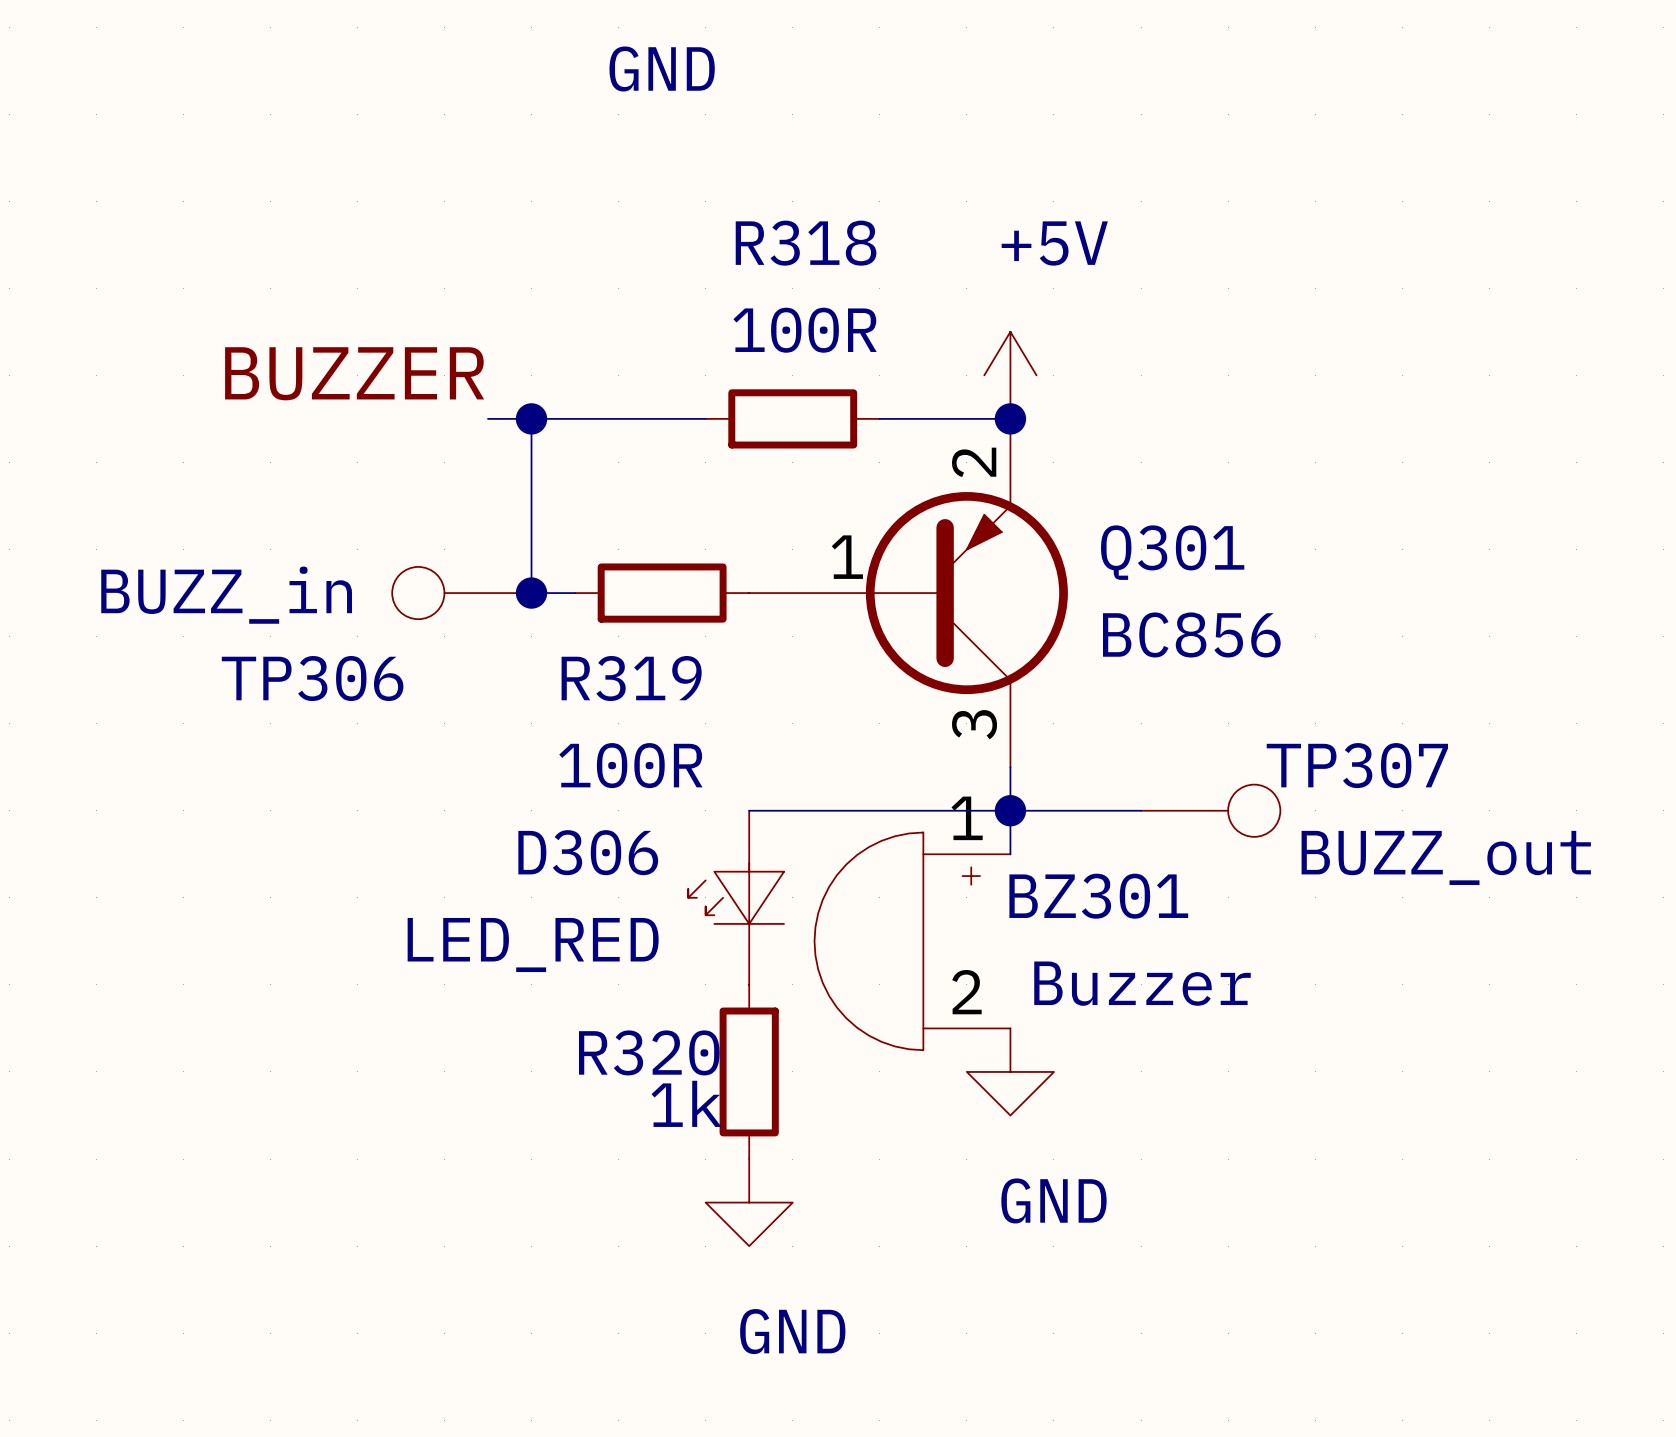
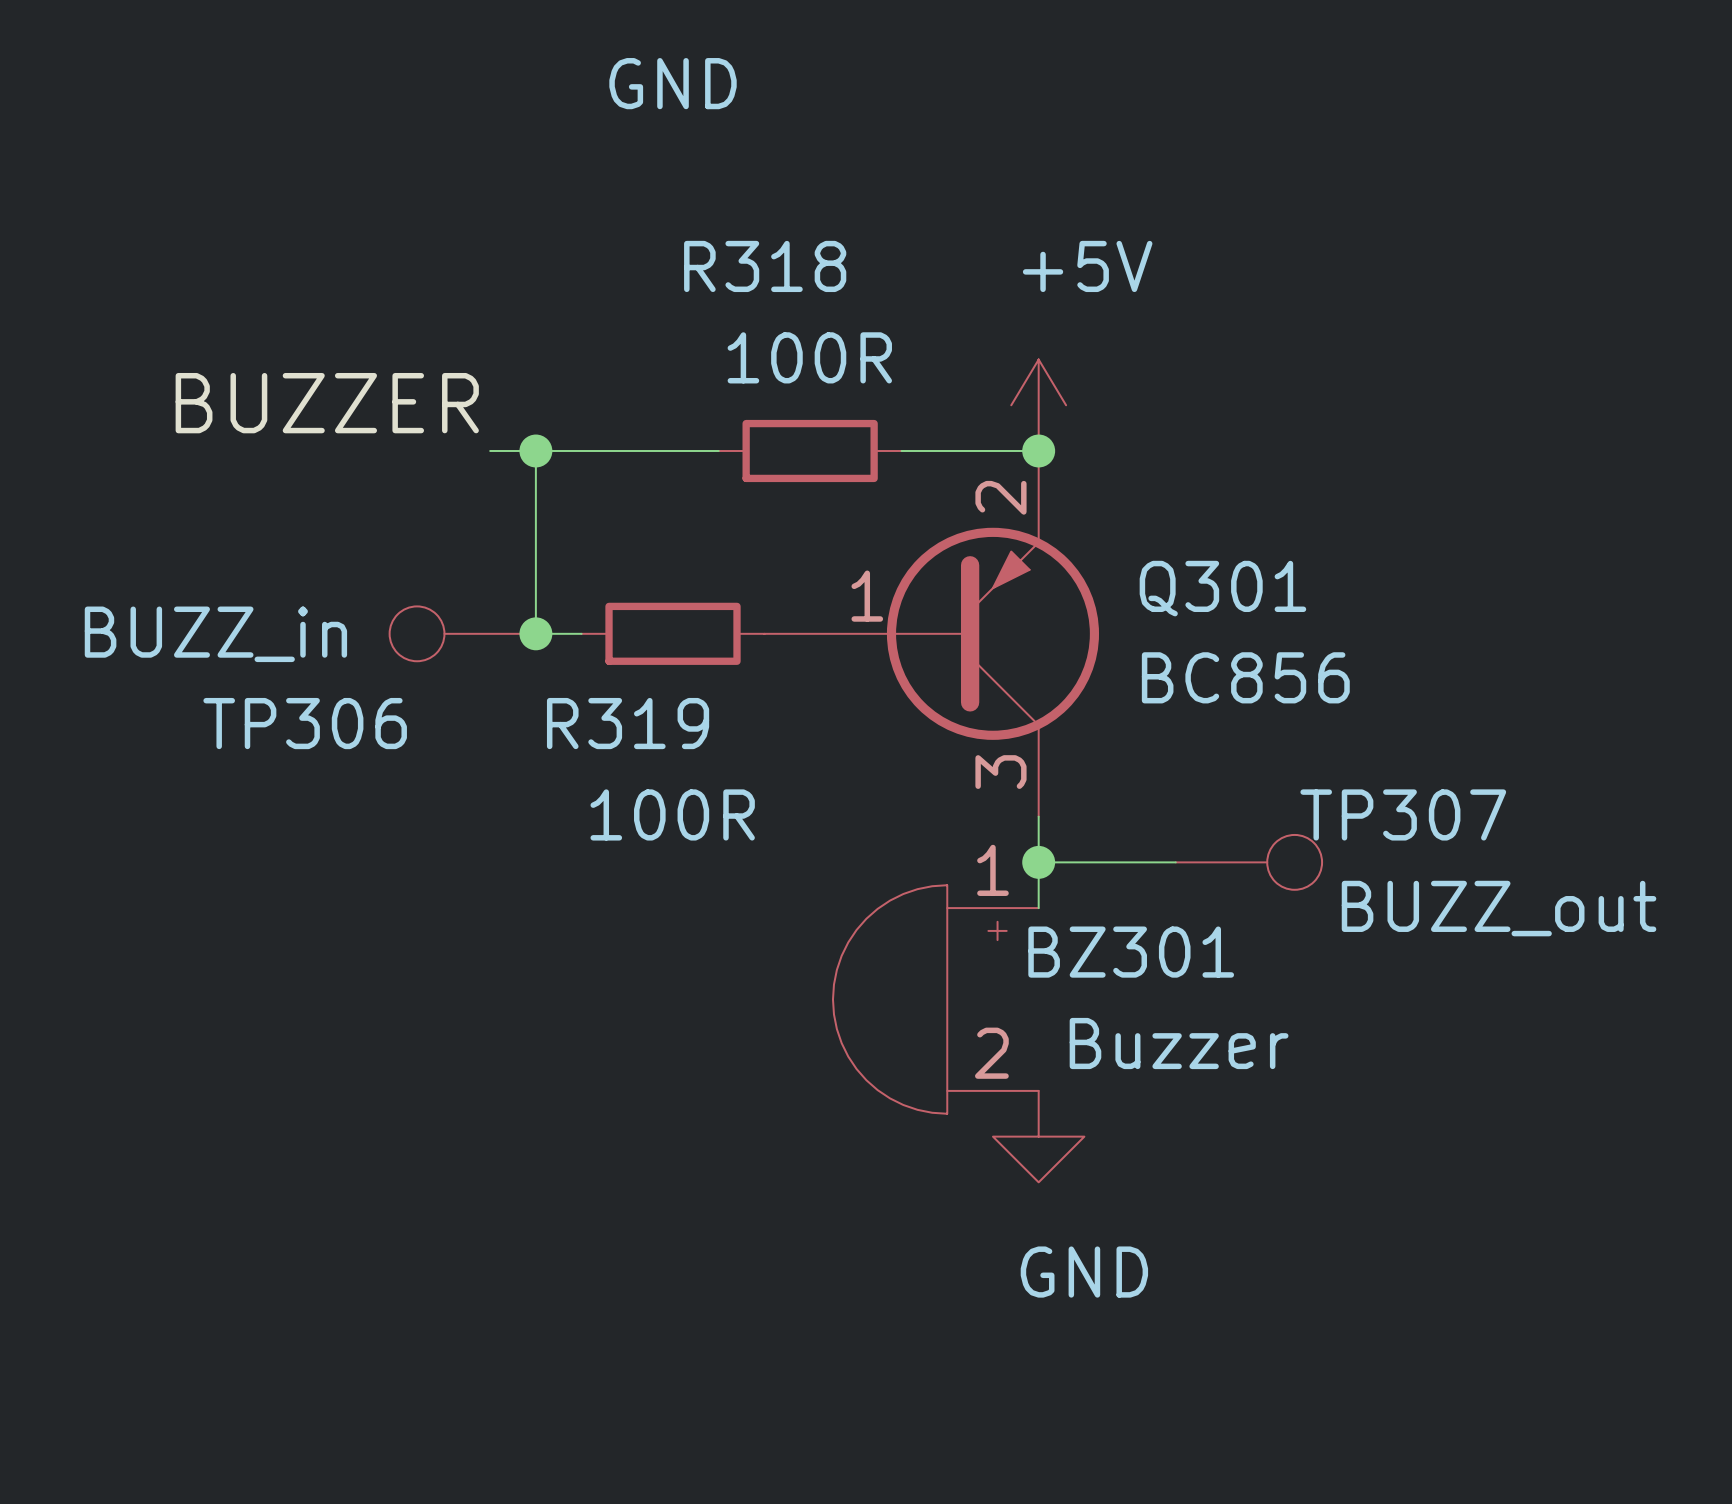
R318 name position: R318 (806, 243) -> R318 (765, 266)
R319 value position: 100R (630, 765) -> 100R (672, 814)
wire: (749, 810) (1010, 810) -> none
D306: LED_RED (736, 897) -> none
R320: 1k (749, 1071) -> none
power symbol: GND (749, 1202) -> none

